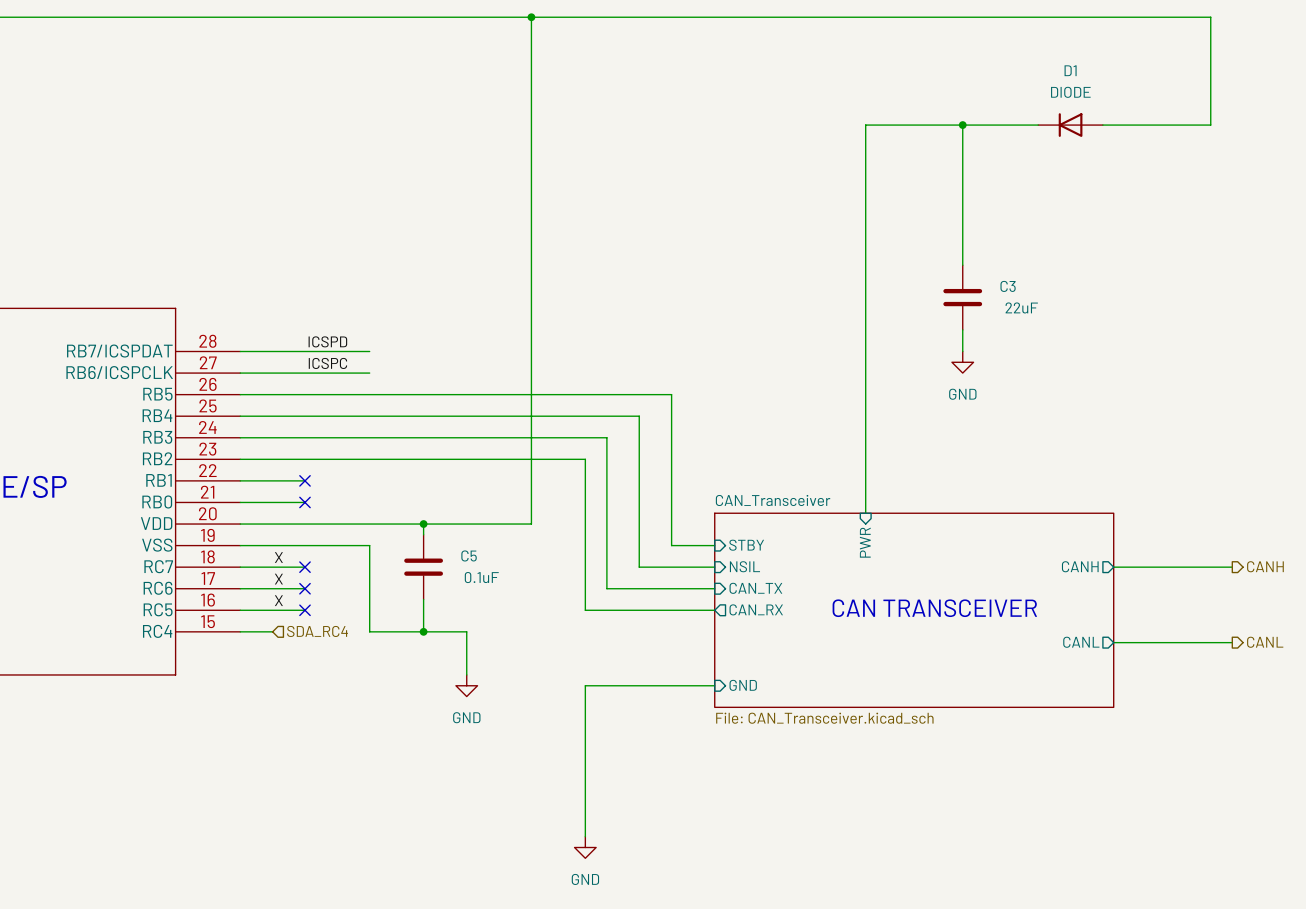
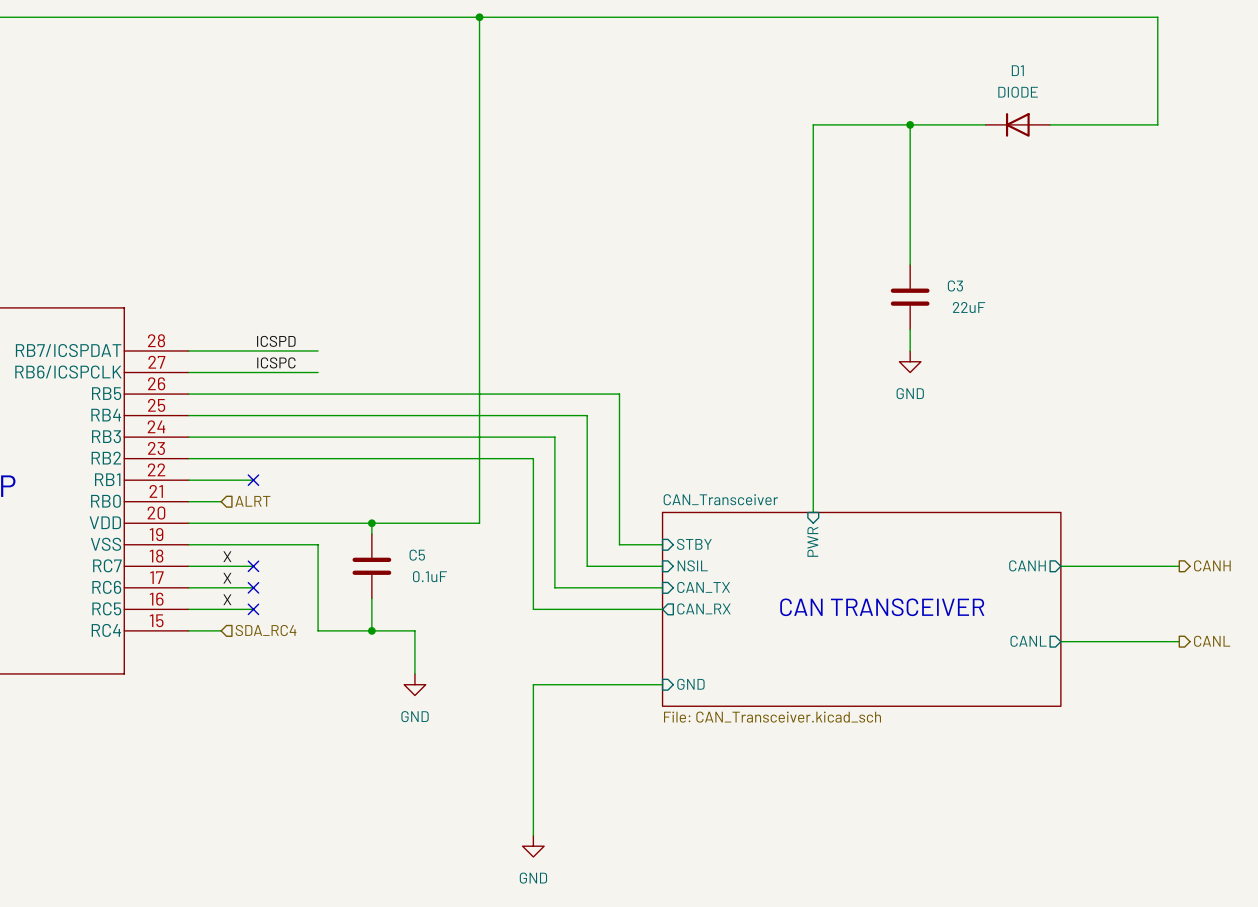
wire: (272, 502) (304, 502) -> none
no-connect mark: (304, 502) -> none
hierarchical label: none -> ALRT (252, 501)

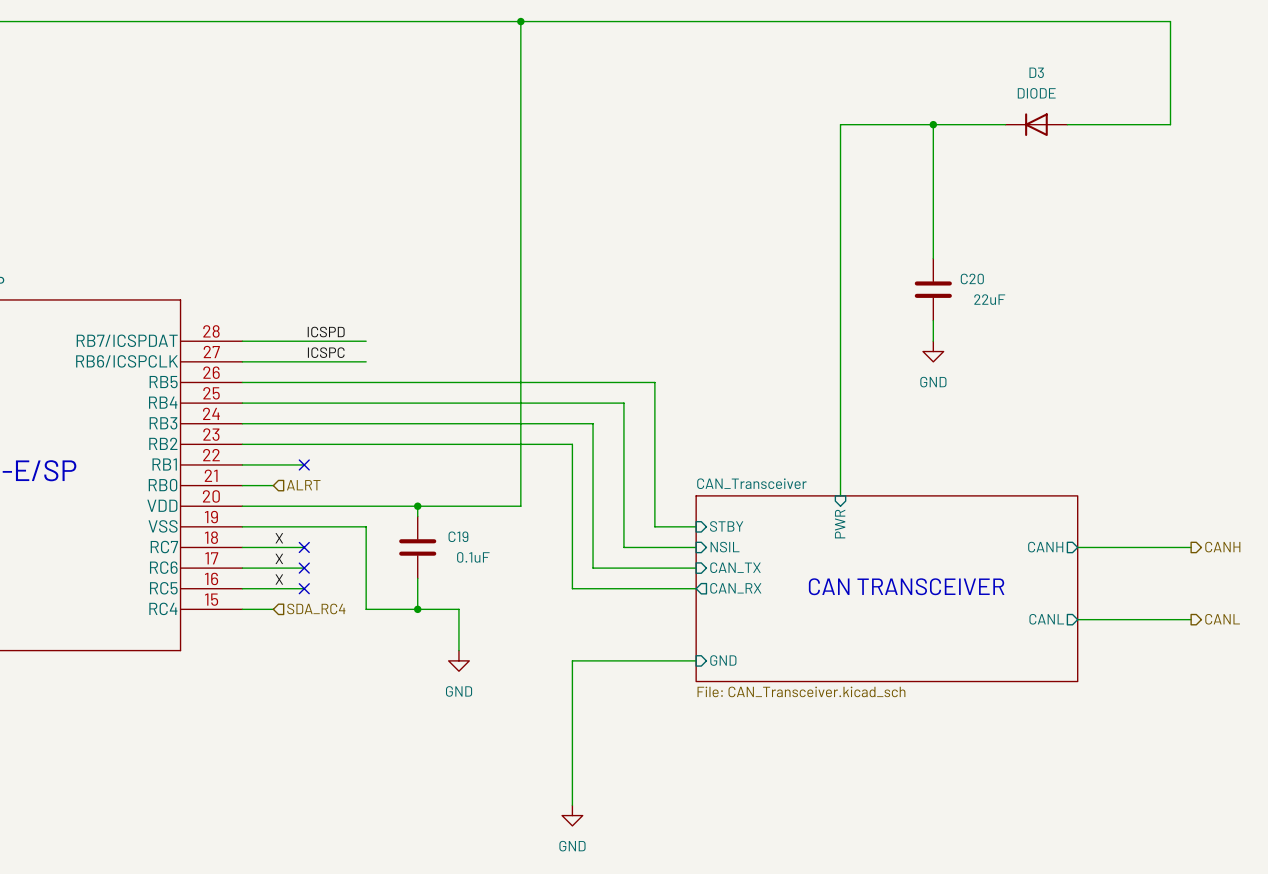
D1 name: D1 (1017, 70) -> D3 (1036, 72)
C3 name: C3 (955, 286) -> C20 (972, 278)
C5 name: C5 (417, 555) -> C19 (458, 536)

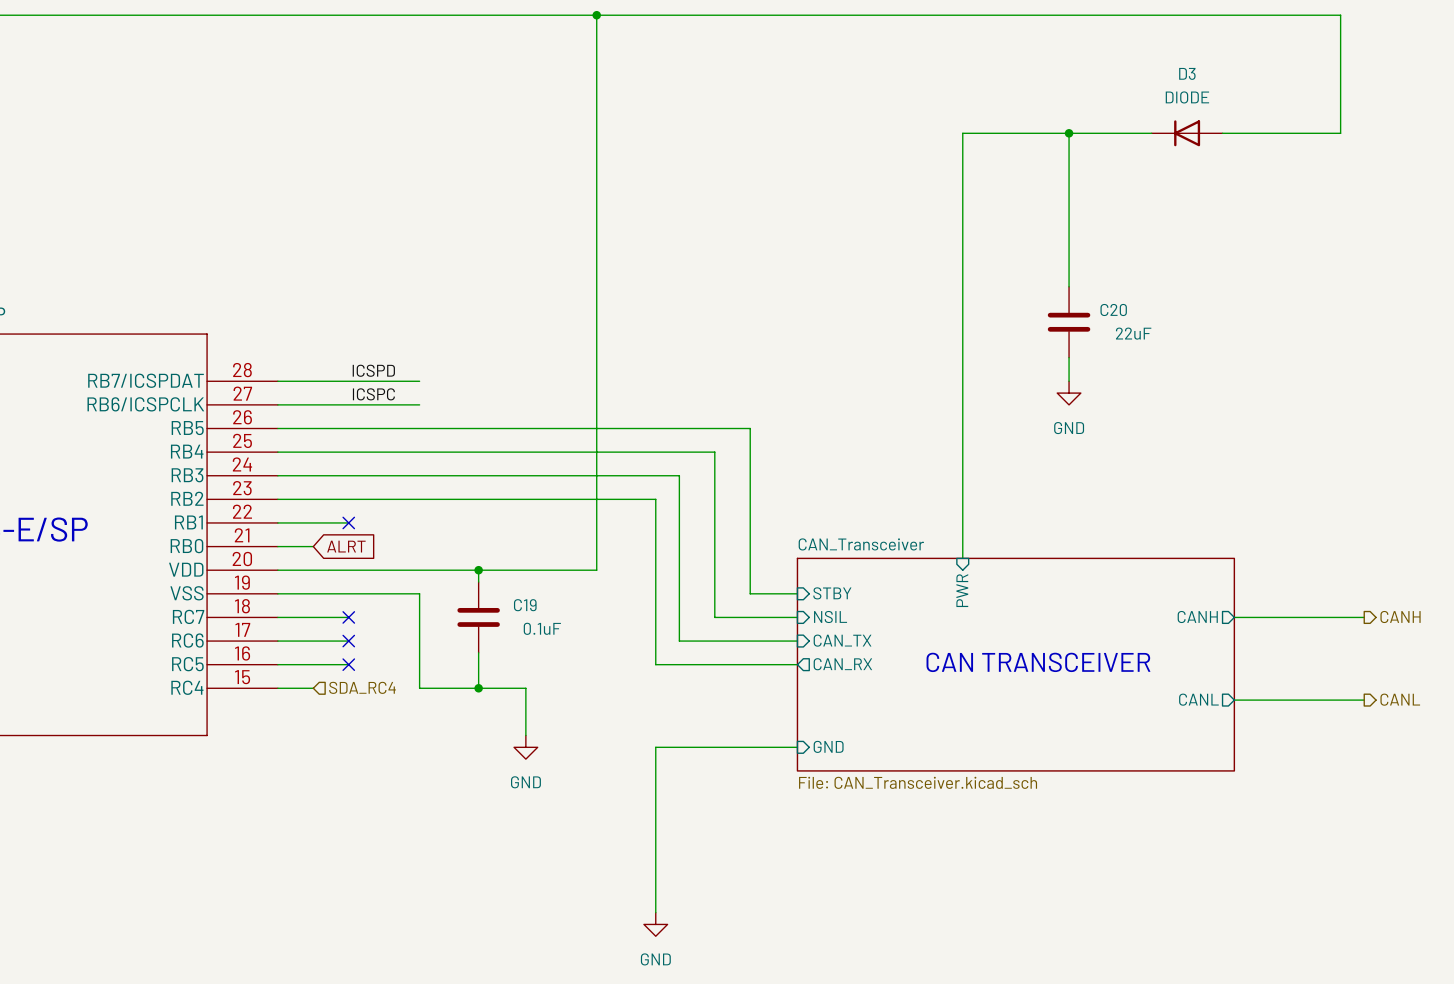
global label: none -> ALRT (346, 546)
hierarchical label: ALRT (303, 485) -> none
label: X (279, 538) -> none
label: X (279, 558) -> none
label: X (279, 579) -> none

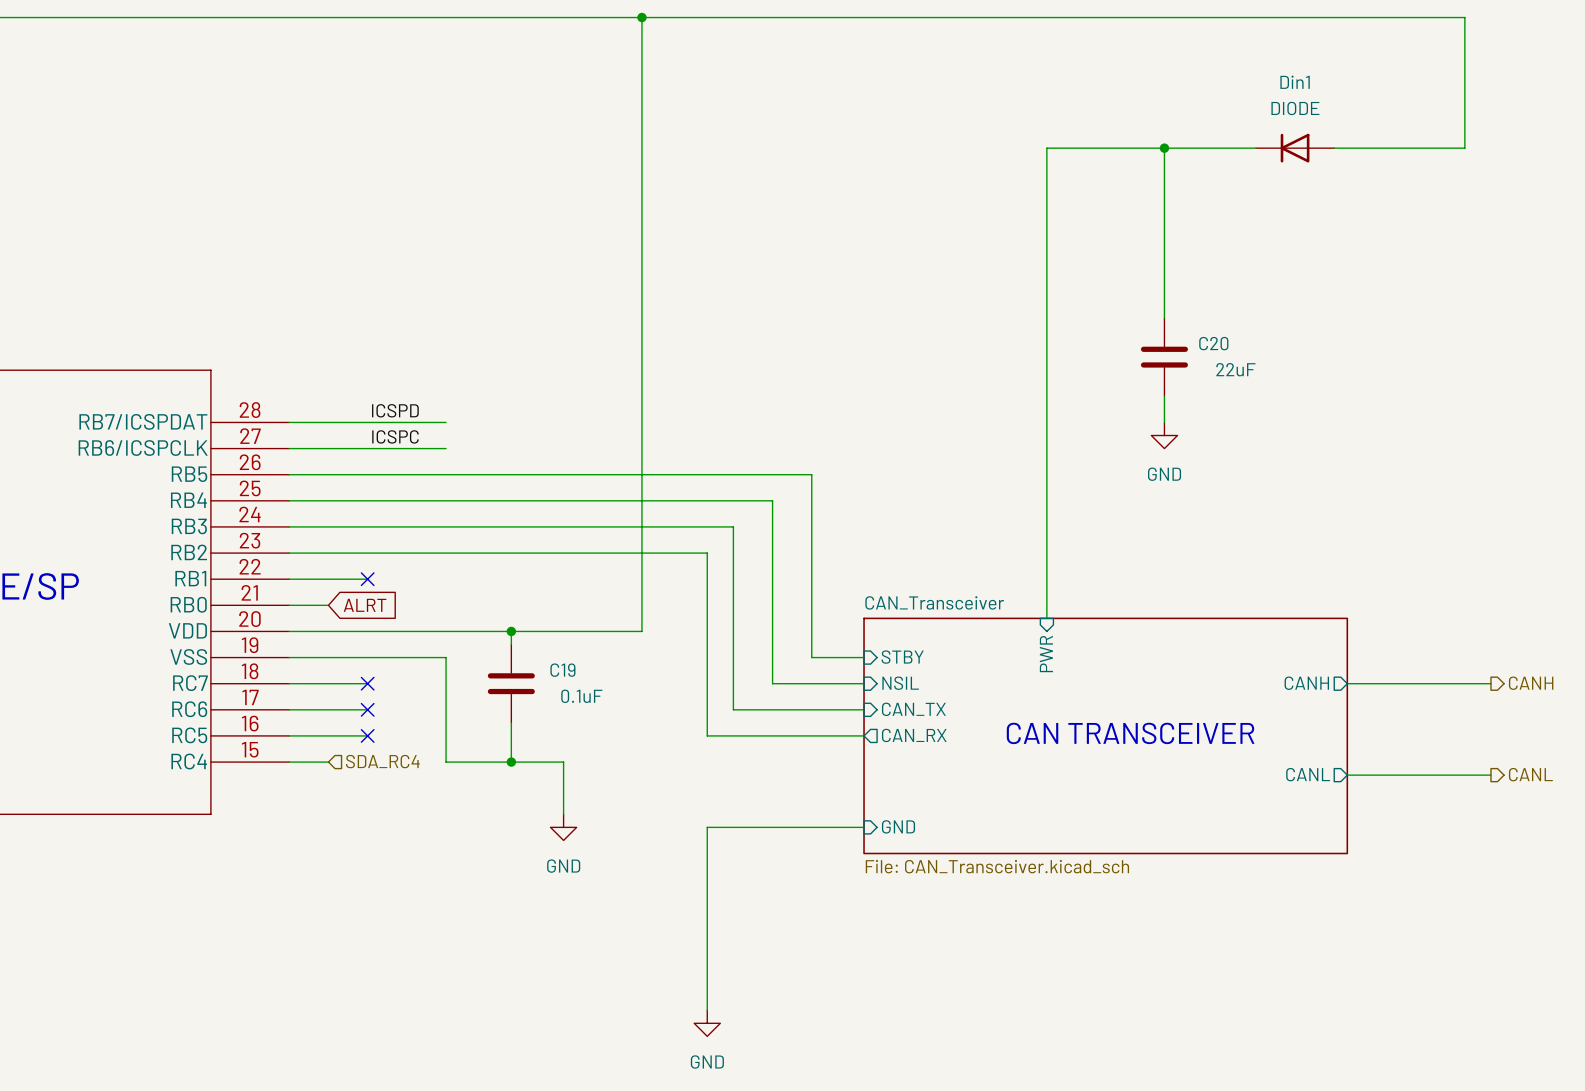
D3 name: D3 (1187, 73) -> Din1 (1295, 82)

